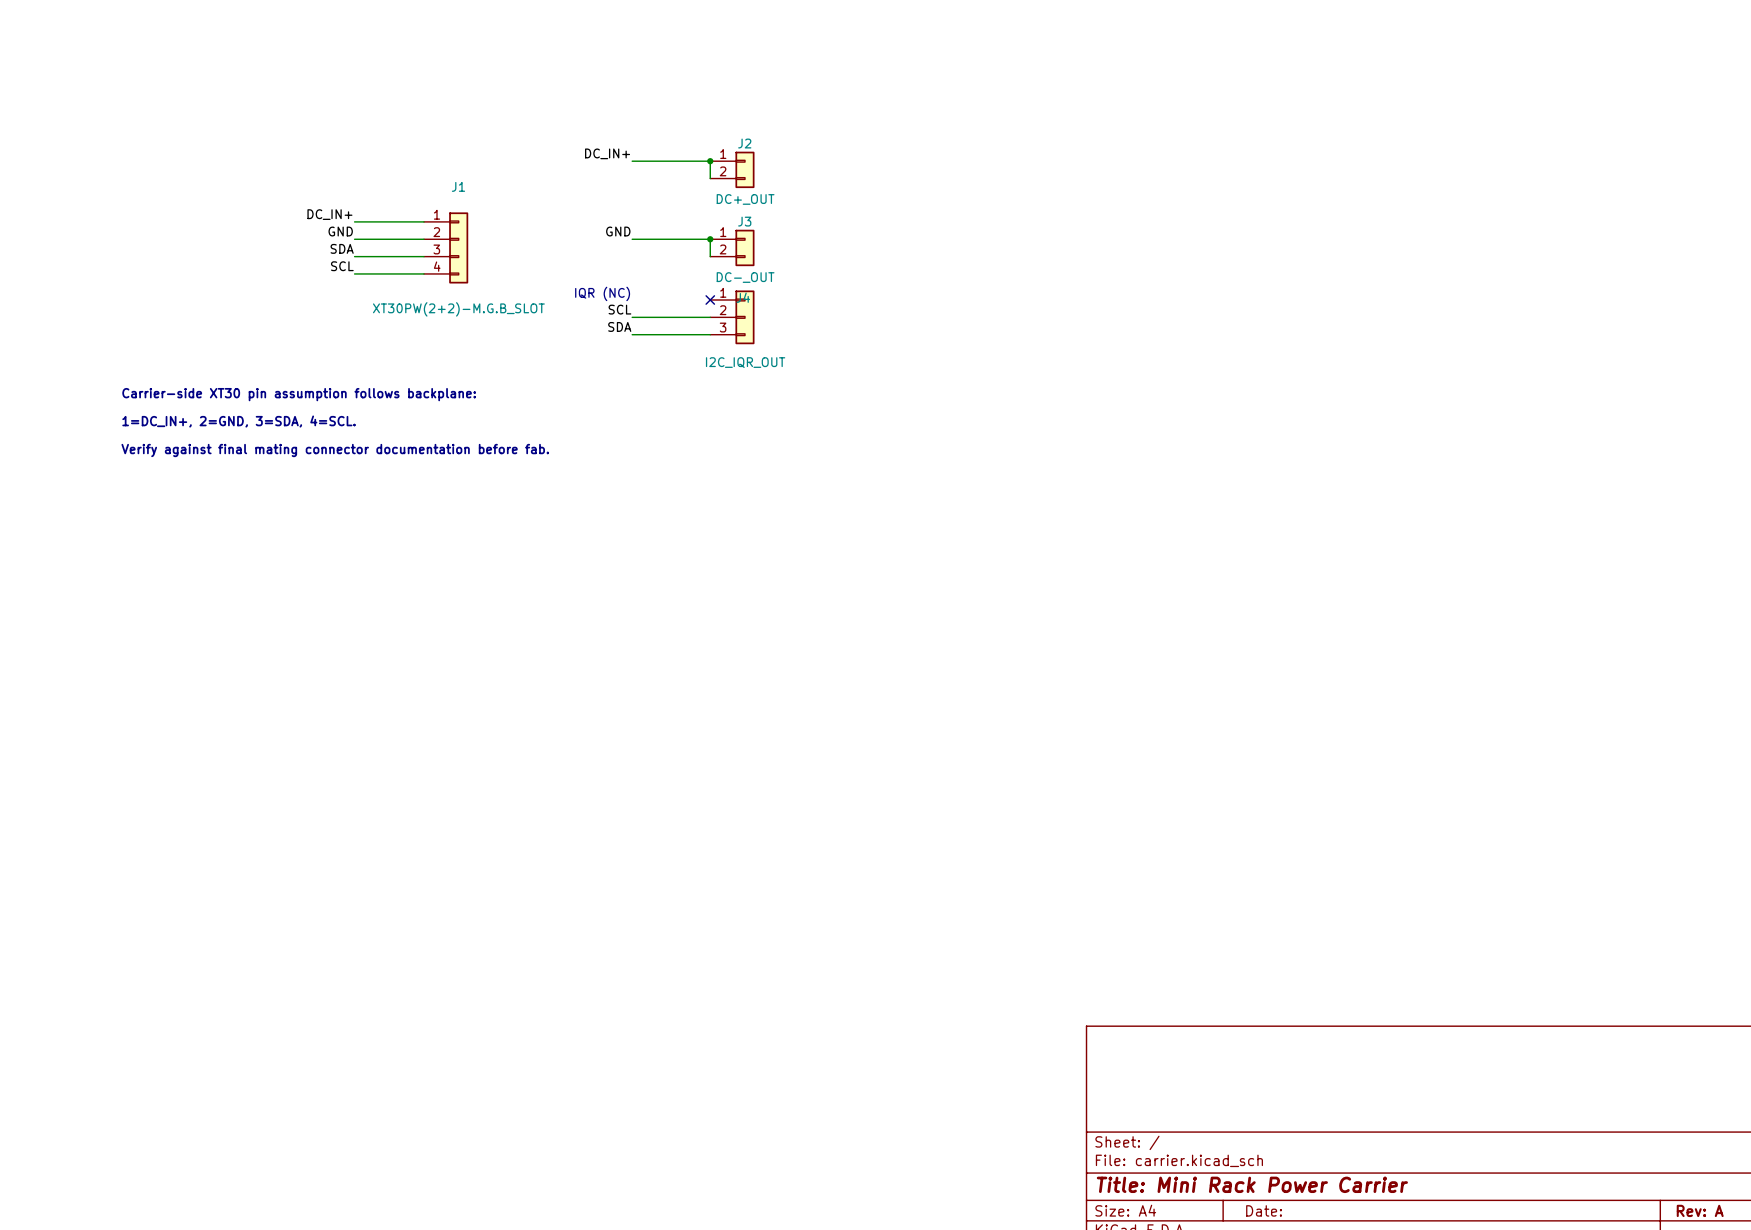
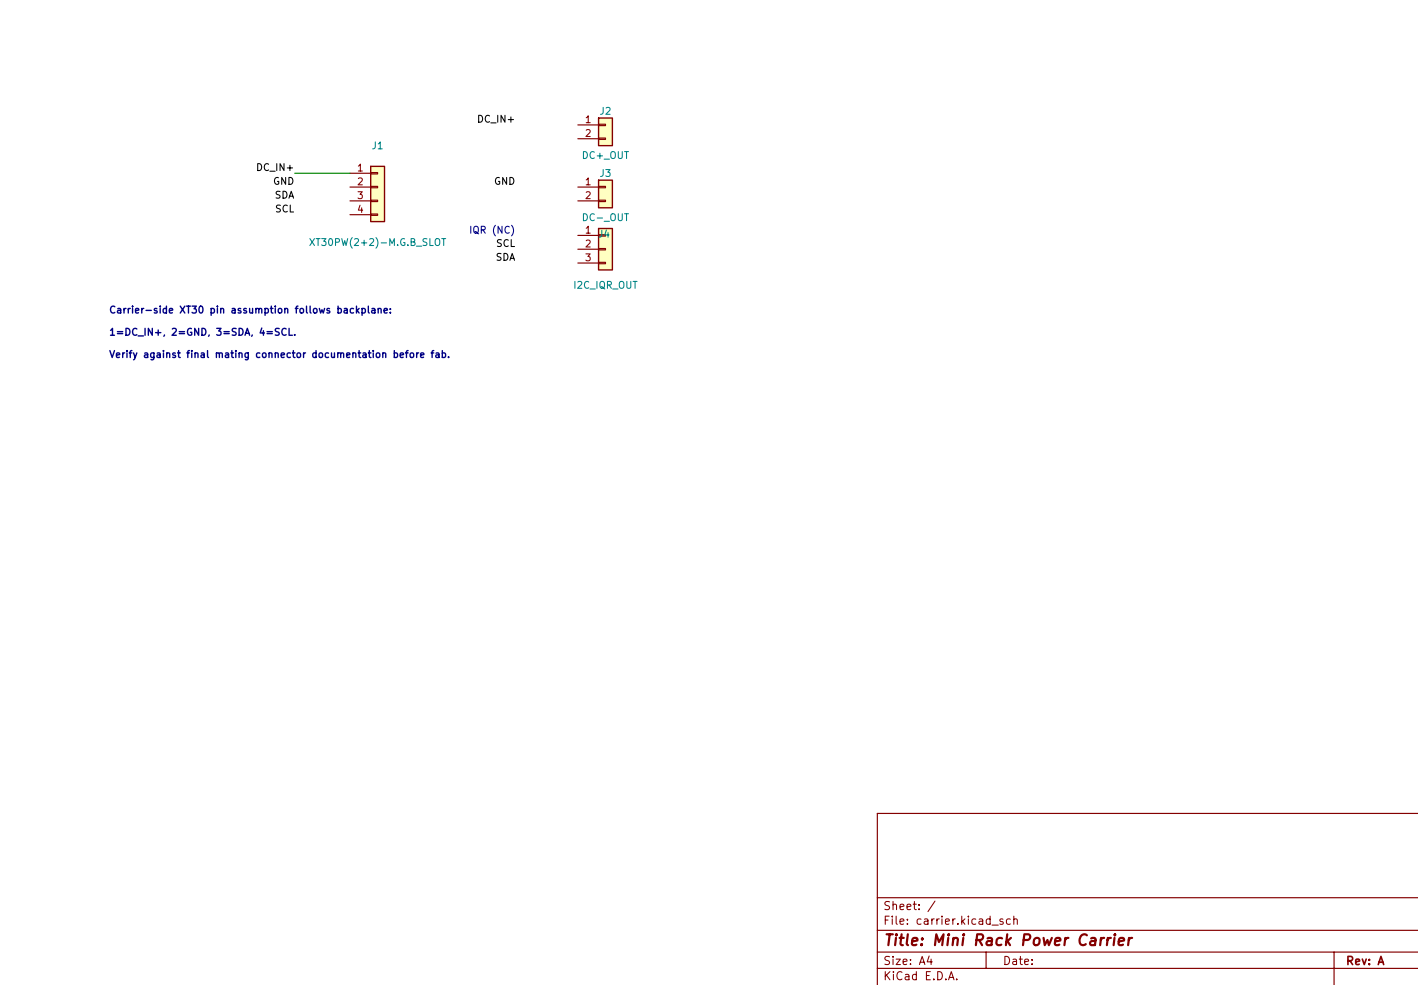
wire: (632, 161) (710, 161) (710, 178) -> none
junction: (710, 161) -> none
wire: (354, 239) (423, 239) -> none
wire: (632, 239) (710, 239) (710, 256) -> none
junction: (710, 239) -> none
wire: (354, 256) (423, 256) -> none
wire: (354, 273) (423, 273) -> none
no-connect mark: (710, 300) -> none
wire: (632, 317) (710, 317) -> none
wire: (632, 334) (710, 334) -> none

